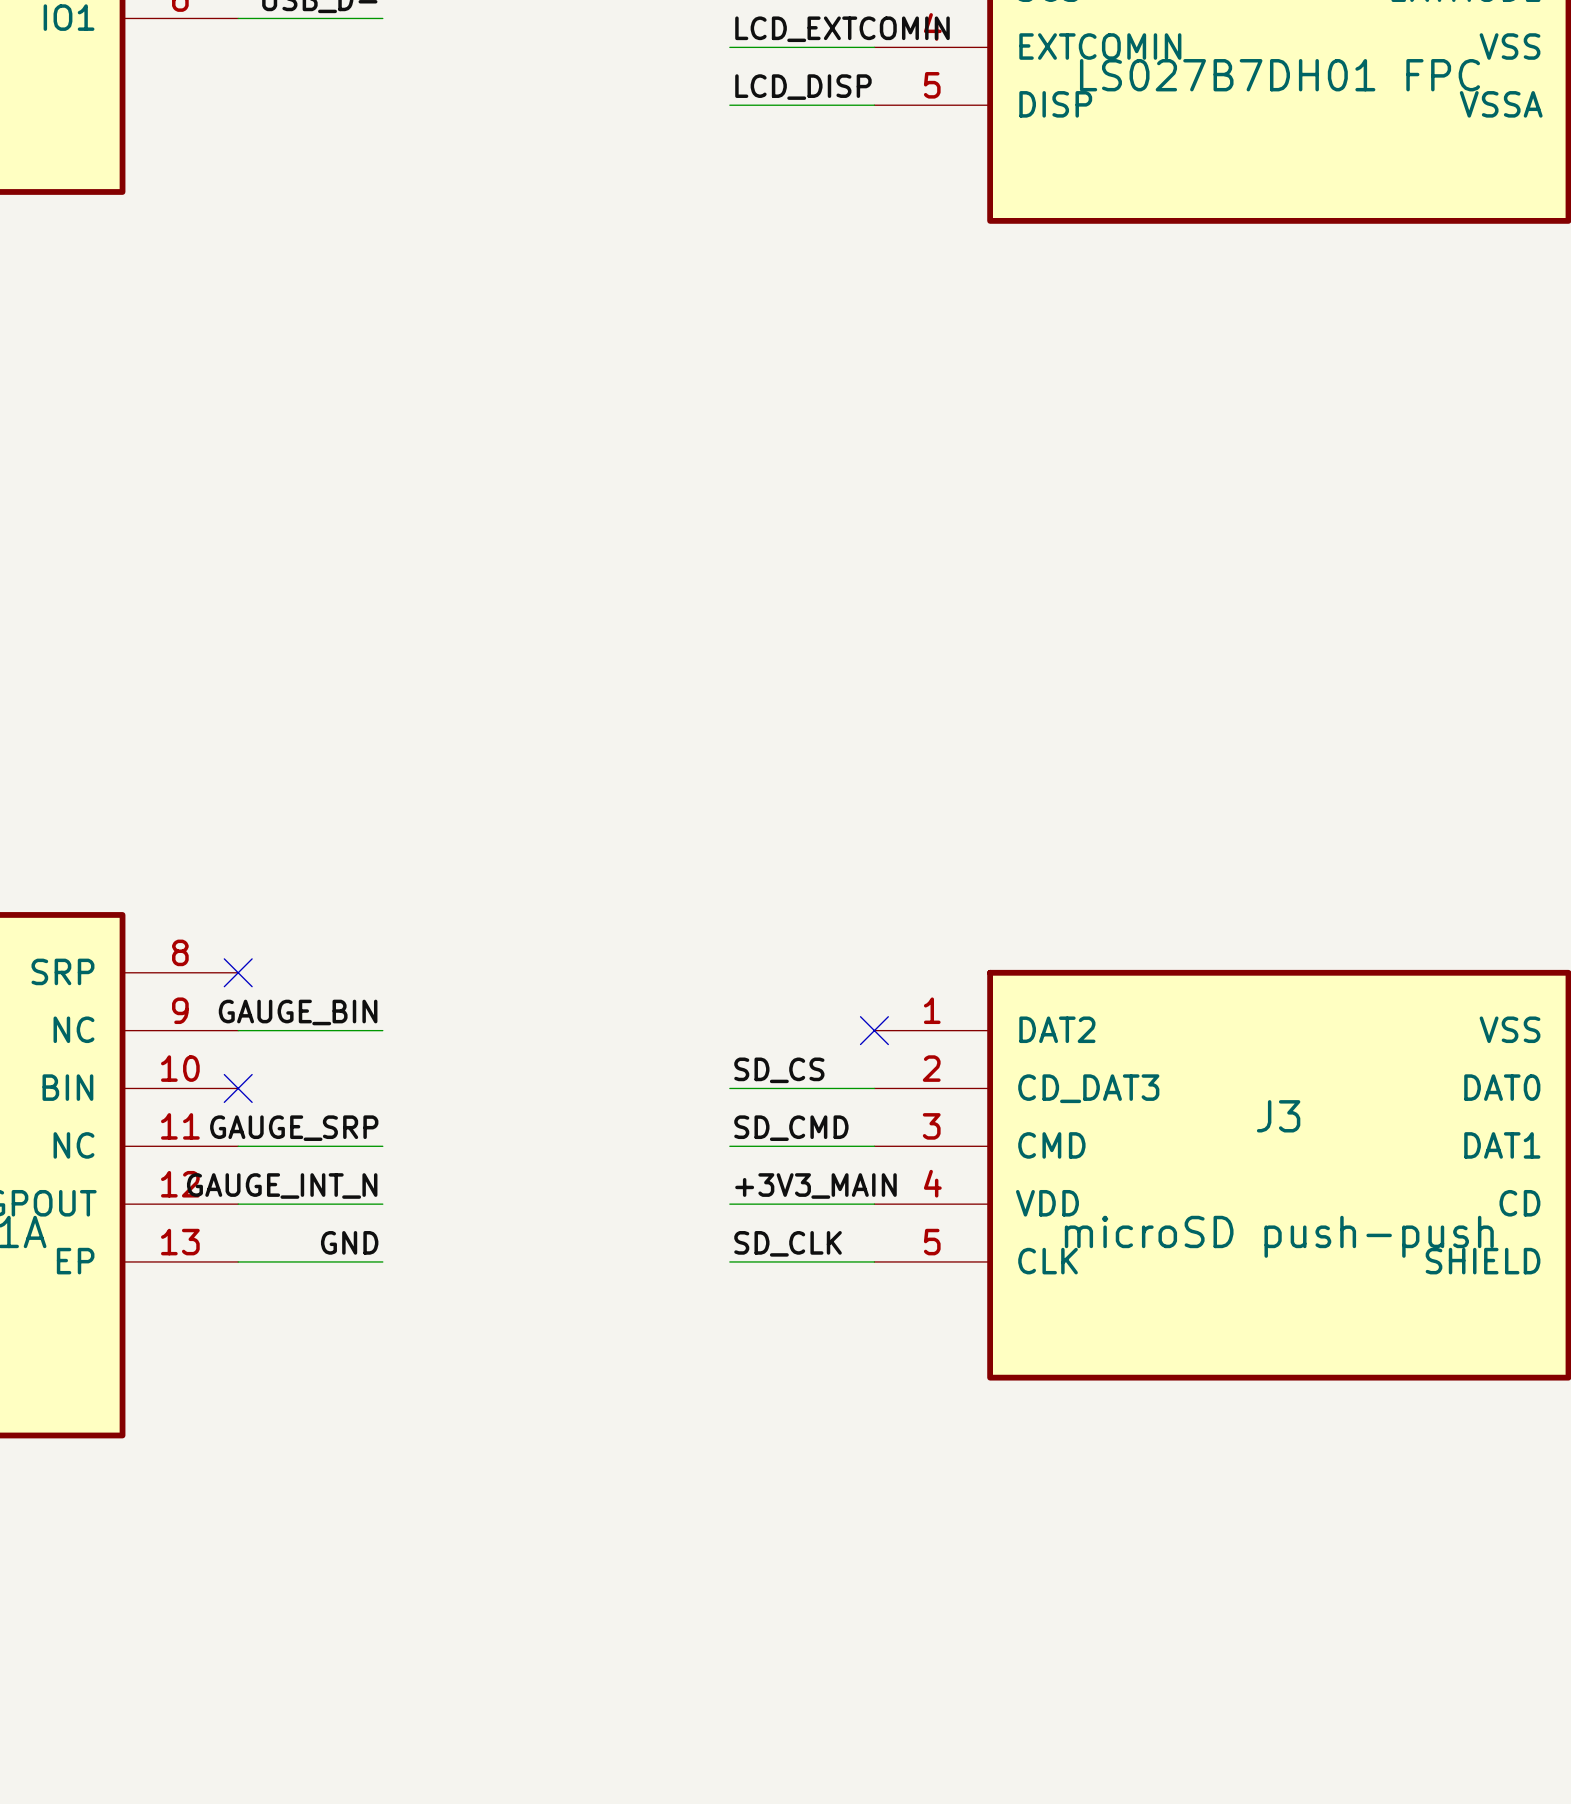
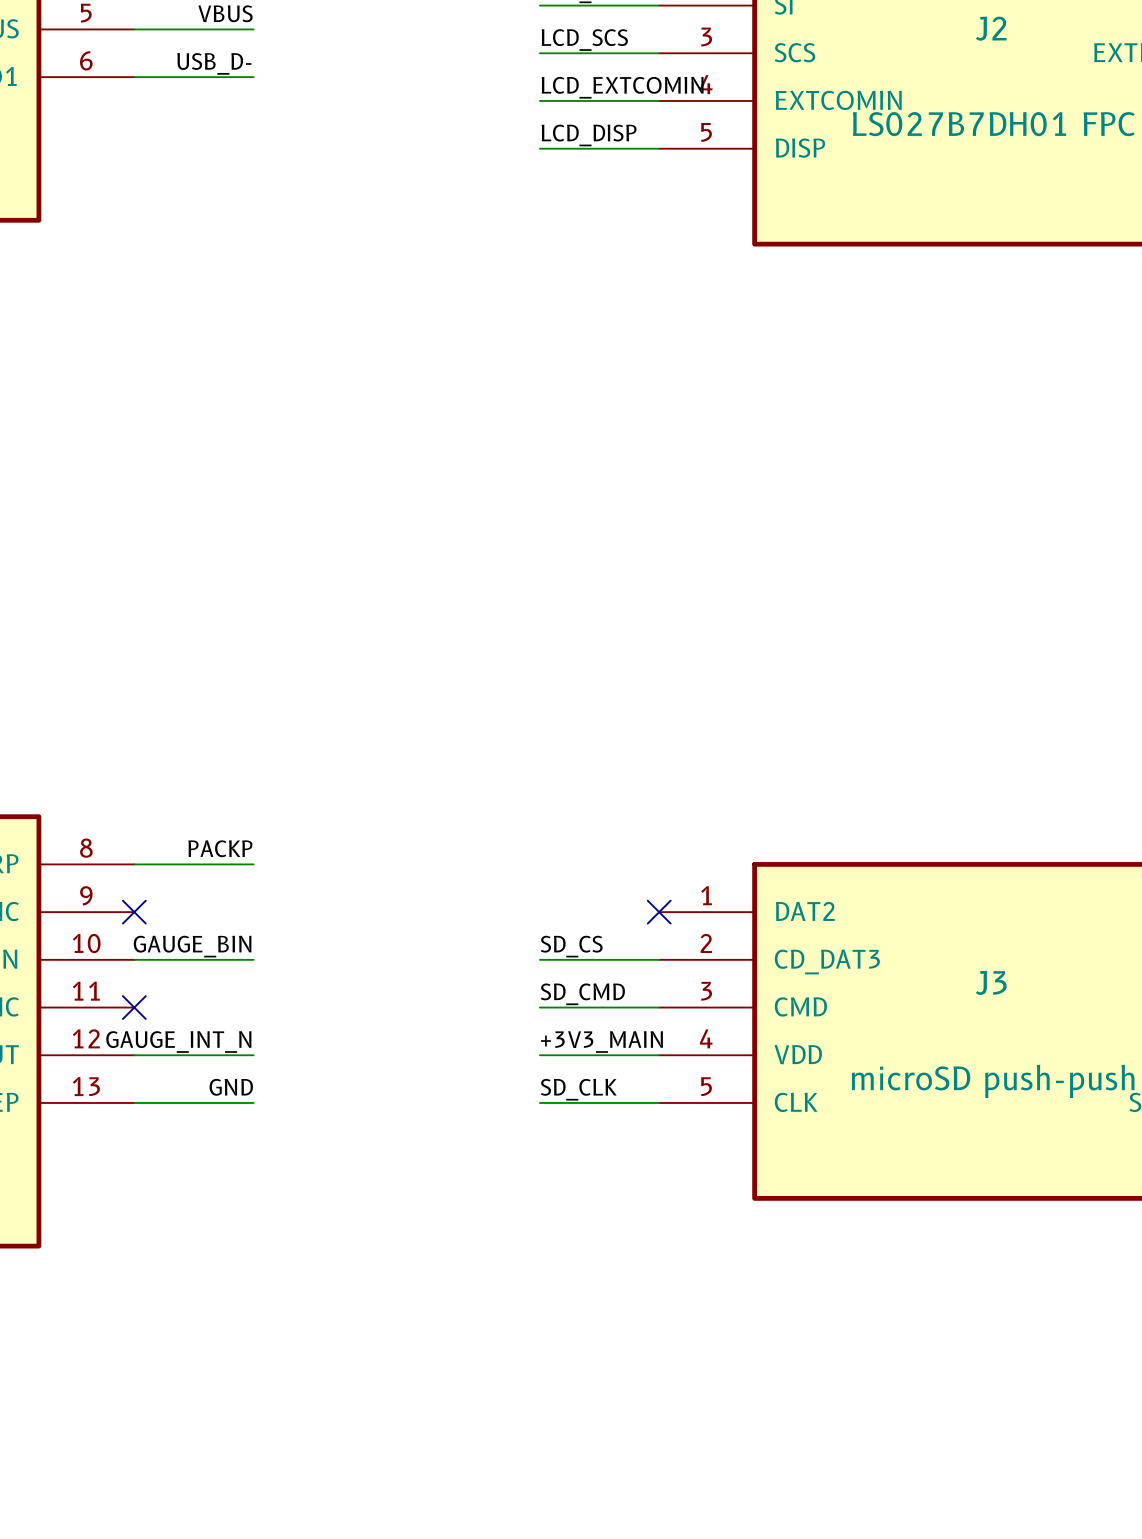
label: none -> PACKP (220, 848)
no-connect mark: (238, 972) -> none
label position: GAUGE_BIN (298, 1012) -> GAUGE_BIN (192, 946)
wire: (238, 1030) (382, 1030) -> (134, 864) (253, 864)
no-connect mark: none -> (134, 912)
no-connect mark: (238, 1088) -> none
label: GAUGE_SRP (294, 1128) -> none
wire: (238, 1146) (382, 1146) -> (134, 959) (253, 959)
no-connect mark: none -> (134, 1007)

